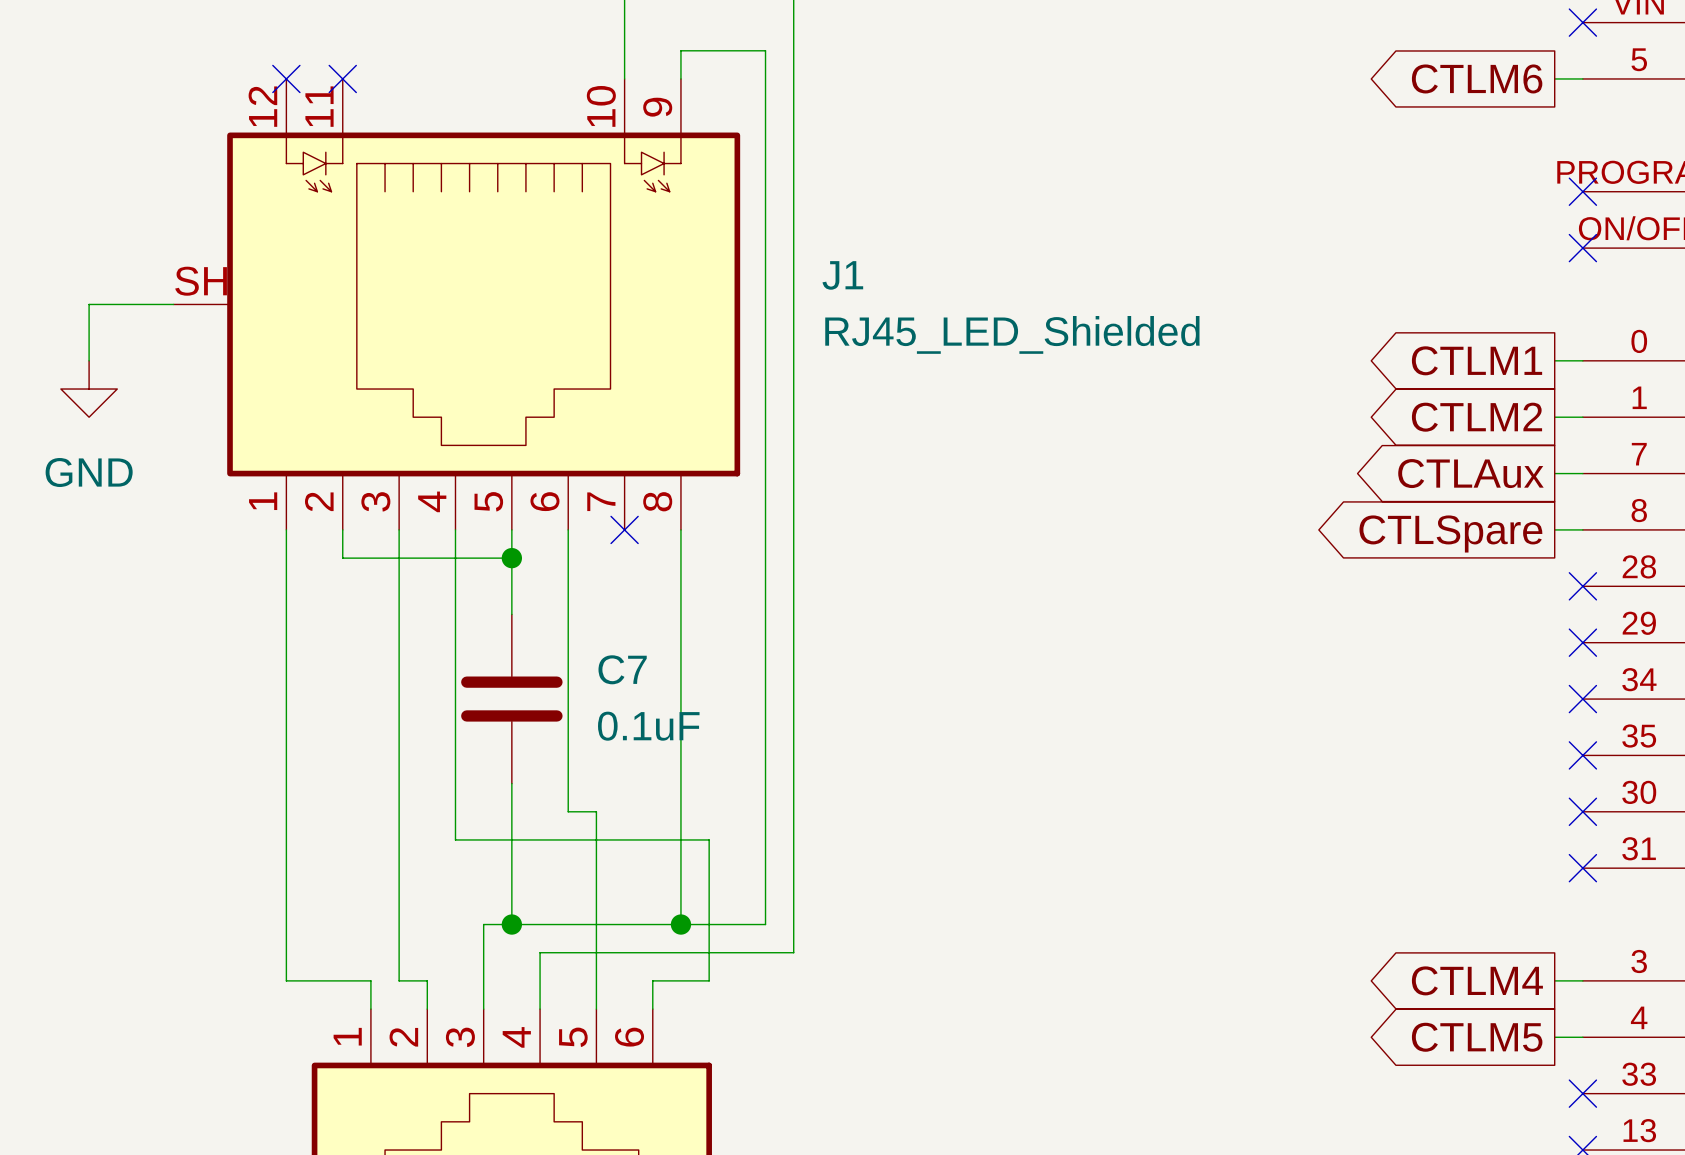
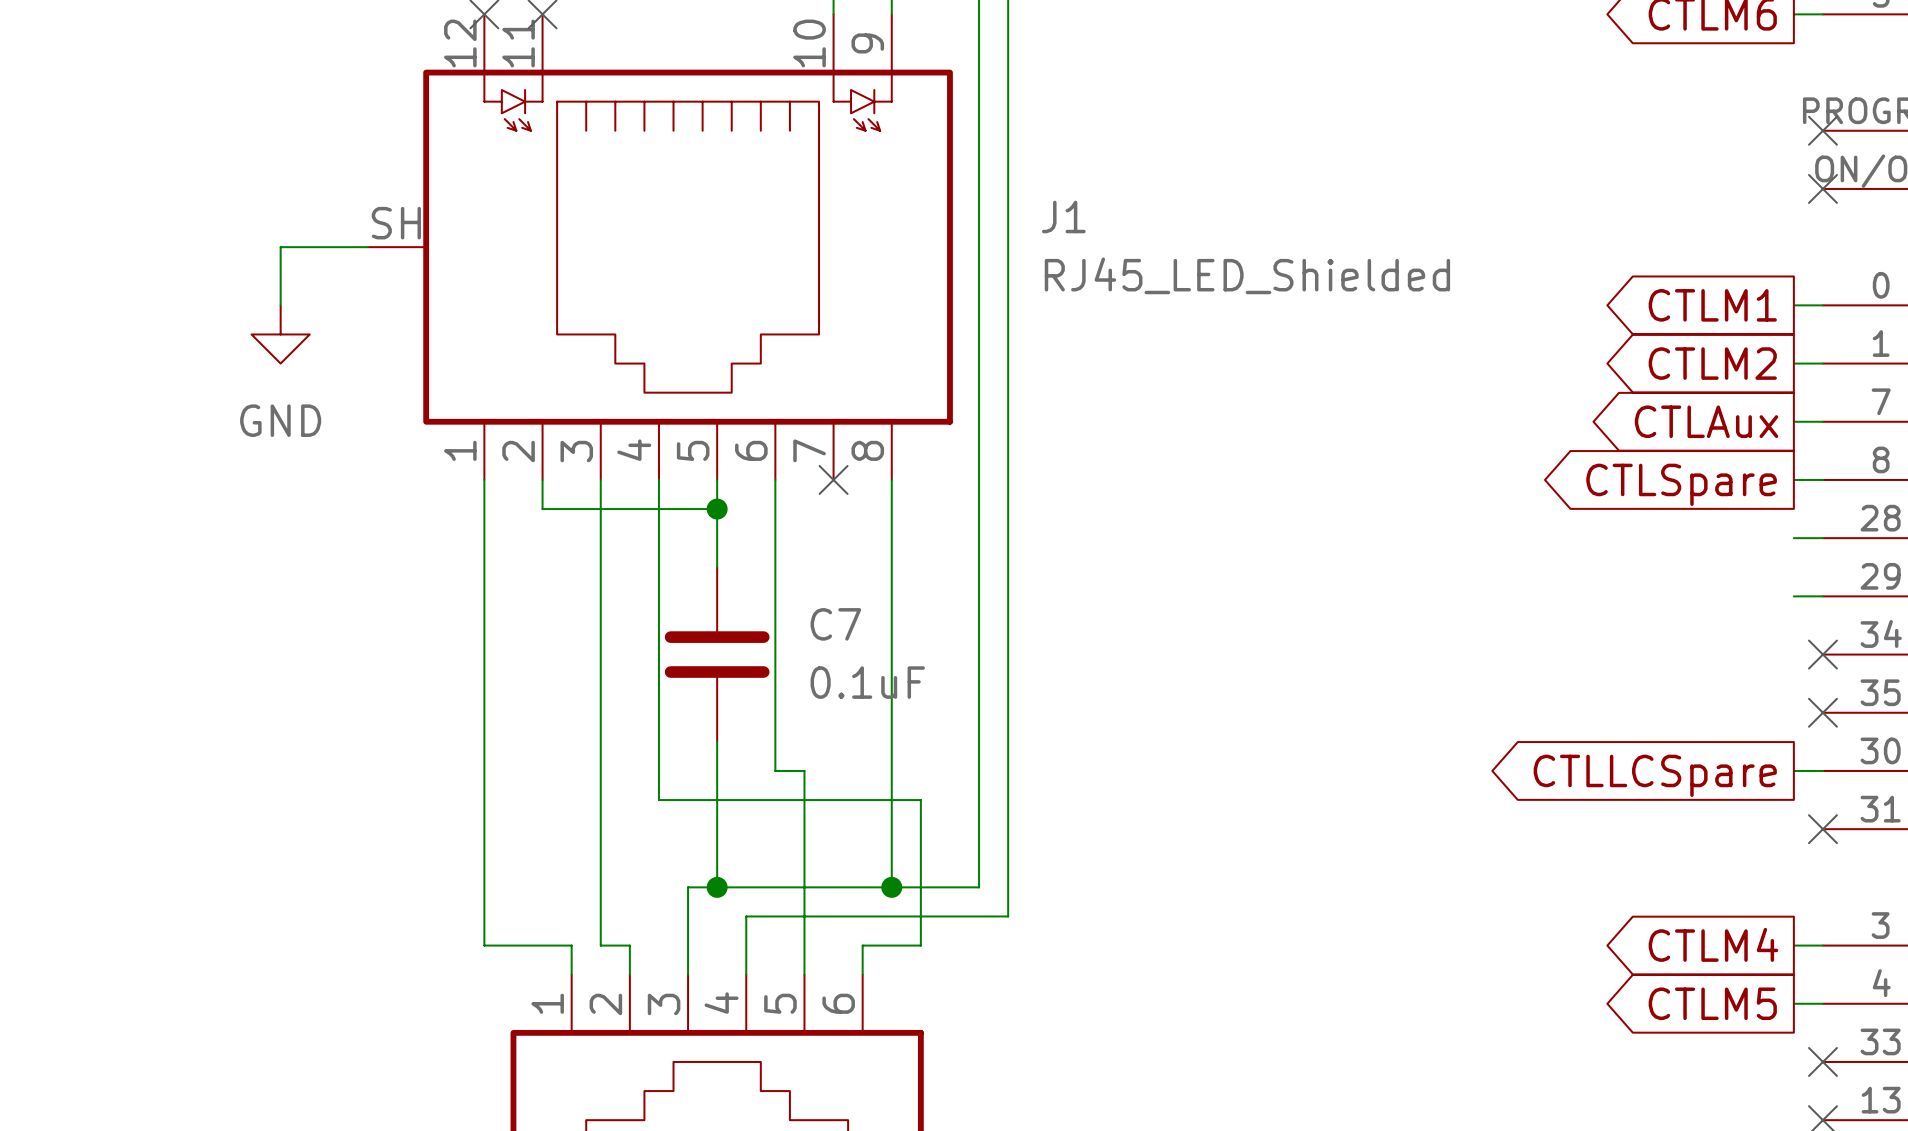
wire: none -> (1793, 538) (1822, 538)
no-connect mark: (1582, 586) -> none
wire: none -> (1793, 596) (1822, 596)
no-connect mark: (1582, 642) -> none
wire: none -> (1793, 770) (1822, 770)
no-connect mark: (1582, 811) -> none
global label: none -> CTLLCSpare (1655, 775)

